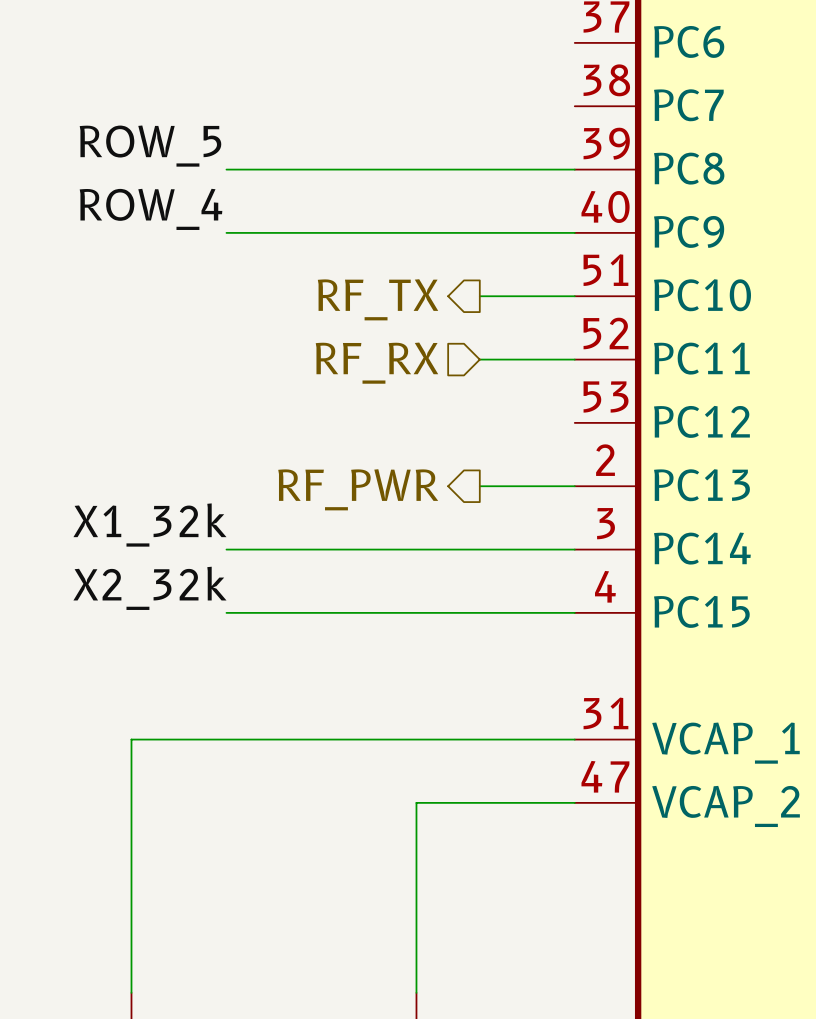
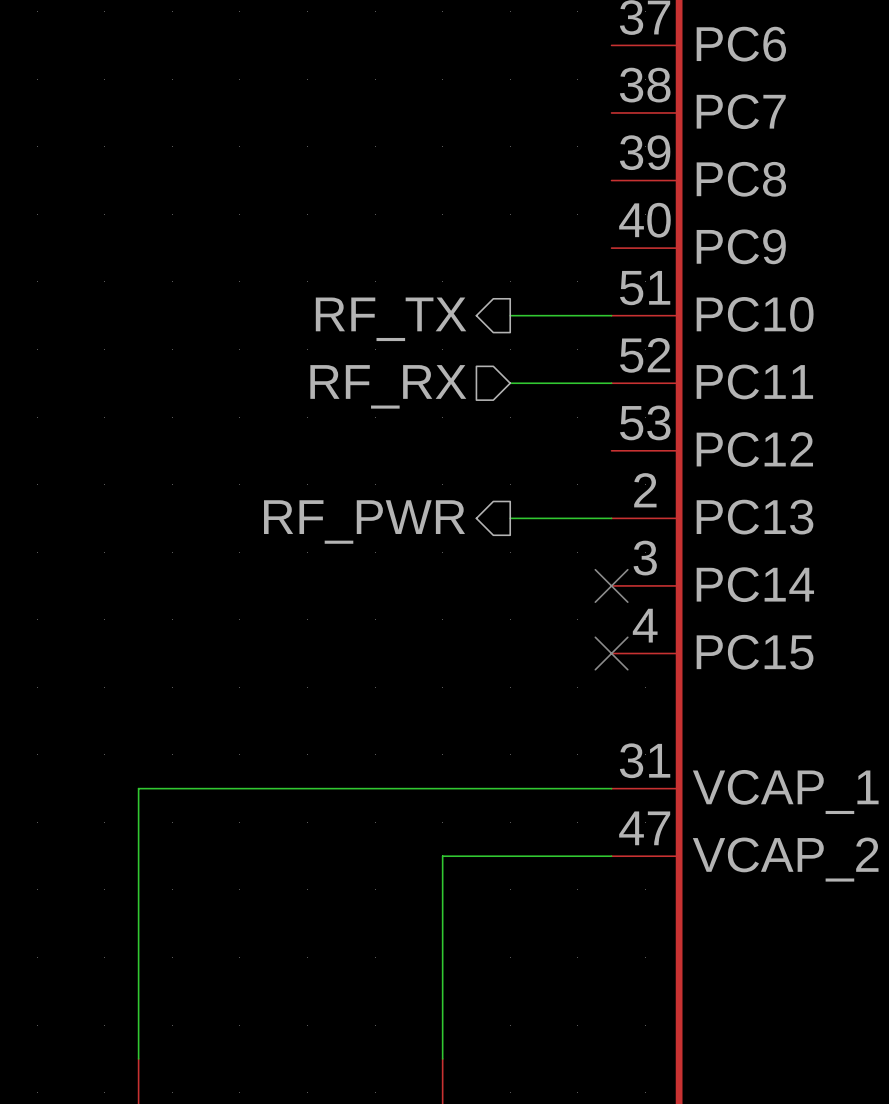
label: ROW_5 (150, 146) -> none
wire: (226, 169) (574, 169) -> none
label: ROW_4 (151, 209) -> none
wire: (226, 232) (574, 232) -> none
label: X1_32k (149, 525) -> none
wire: (226, 549) (574, 549) -> none
no-connect mark: none -> (611, 585)
label: X2_32k (149, 588) -> none
wire: (226, 612) (574, 612) -> none
no-connect mark: none -> (611, 653)

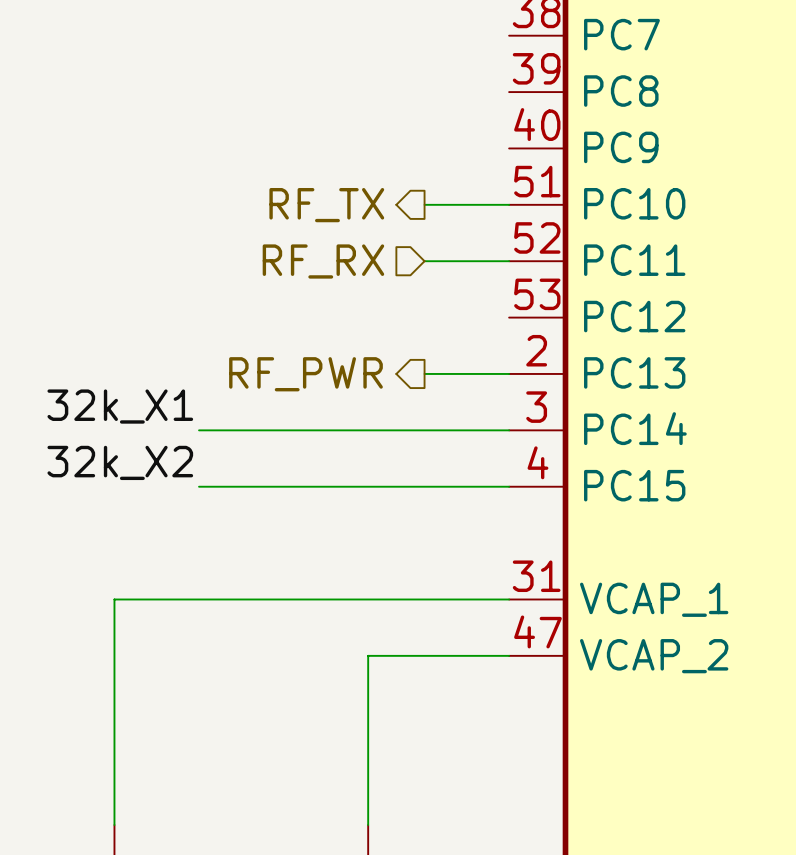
label: none -> 32k_X1 (120, 406)
wire: none -> (199, 430) (509, 430)
no-connect mark: (611, 585) -> none
label: none -> 32k_X2 (120, 462)
wire: none -> (199, 486) (509, 486)
no-connect mark: (611, 653) -> none

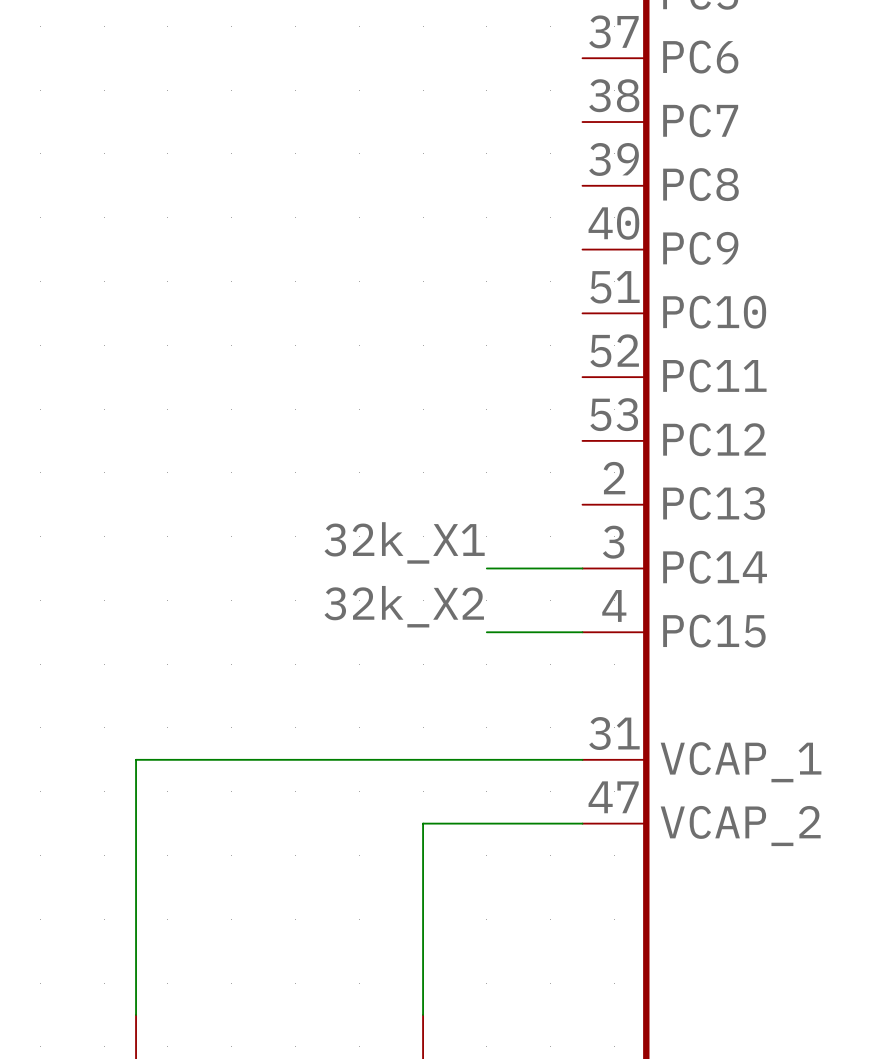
wire: (424, 204) (509, 204) -> none
hierarchical label: RF_TX (326, 205) -> none
hierarchical label: RF_RX (323, 261) -> none
wire: (424, 261) (509, 261) -> none
wire: (424, 373) (509, 373) -> none
hierarchical label: RF_PWR (305, 374) -> none
label position: 32k_X1 (120, 406) -> 32k_X1 (404, 542)
wire: (199, 430) (424, 430) -> none
label position: 32k_X2 (120, 462) -> 32k_X2 (404, 606)
wire: (199, 486) (424, 486) -> none

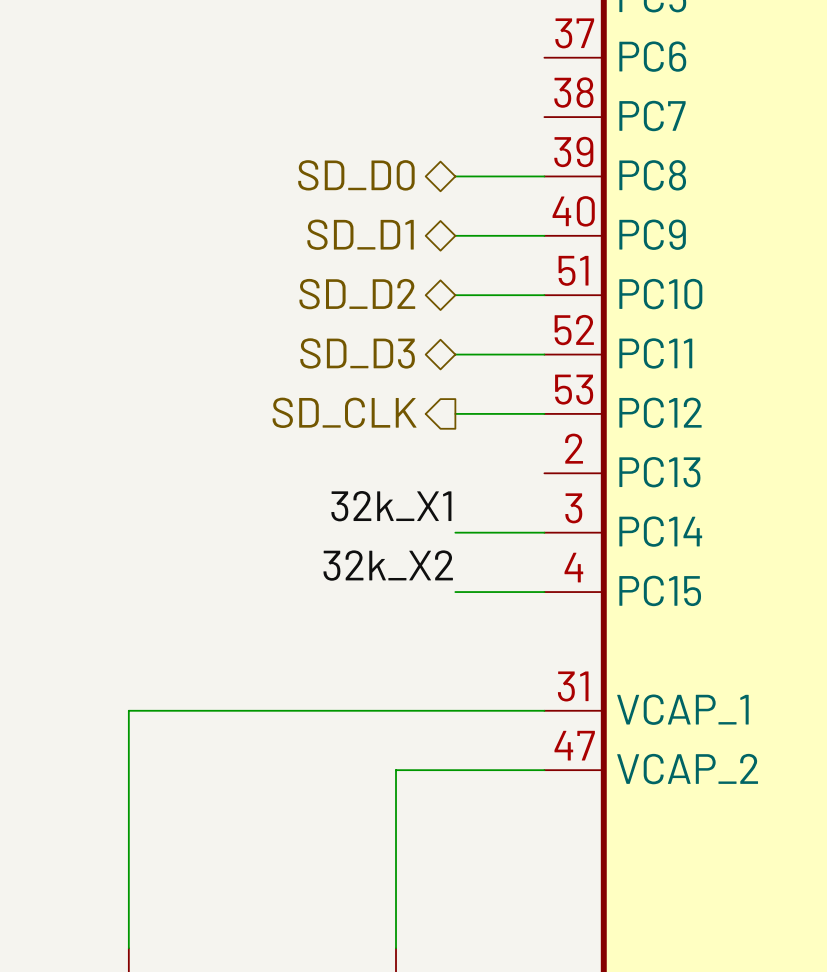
wire: none -> (455, 176) (544, 176)
hierarchical label: none -> SD_D0 (356, 175)
wire: none -> (455, 235) (544, 235)
hierarchical label: none -> SD_D1 (360, 234)
wire: none -> (455, 295) (544, 295)
hierarchical label: none -> SD_D2 (357, 294)
wire: none -> (455, 354) (544, 354)
hierarchical label: none -> SD_D3 (357, 353)
wire: none -> (455, 413) (544, 413)
hierarchical label: none -> SD_CLK (344, 412)

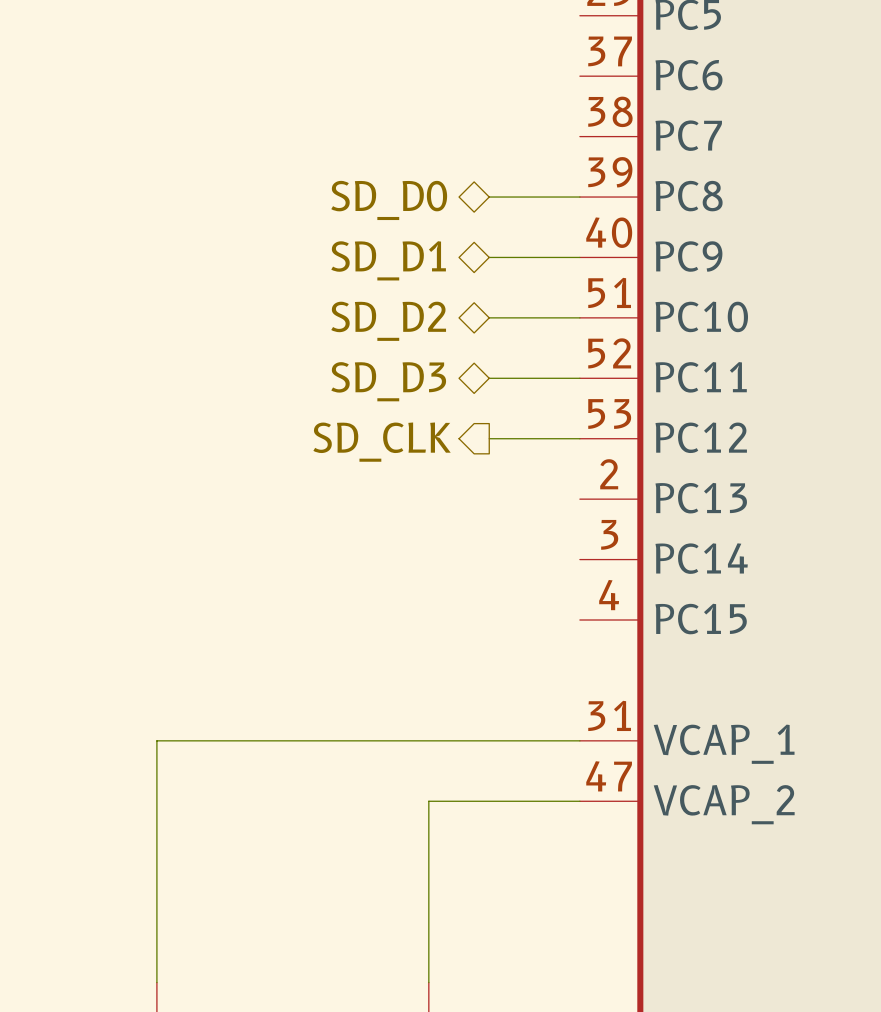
label: 32k_X1 (391, 506) -> none
wire: (455, 532) (544, 532) -> none
label: 32k_X2 (388, 565) -> none
wire: (455, 592) (544, 592) -> none

